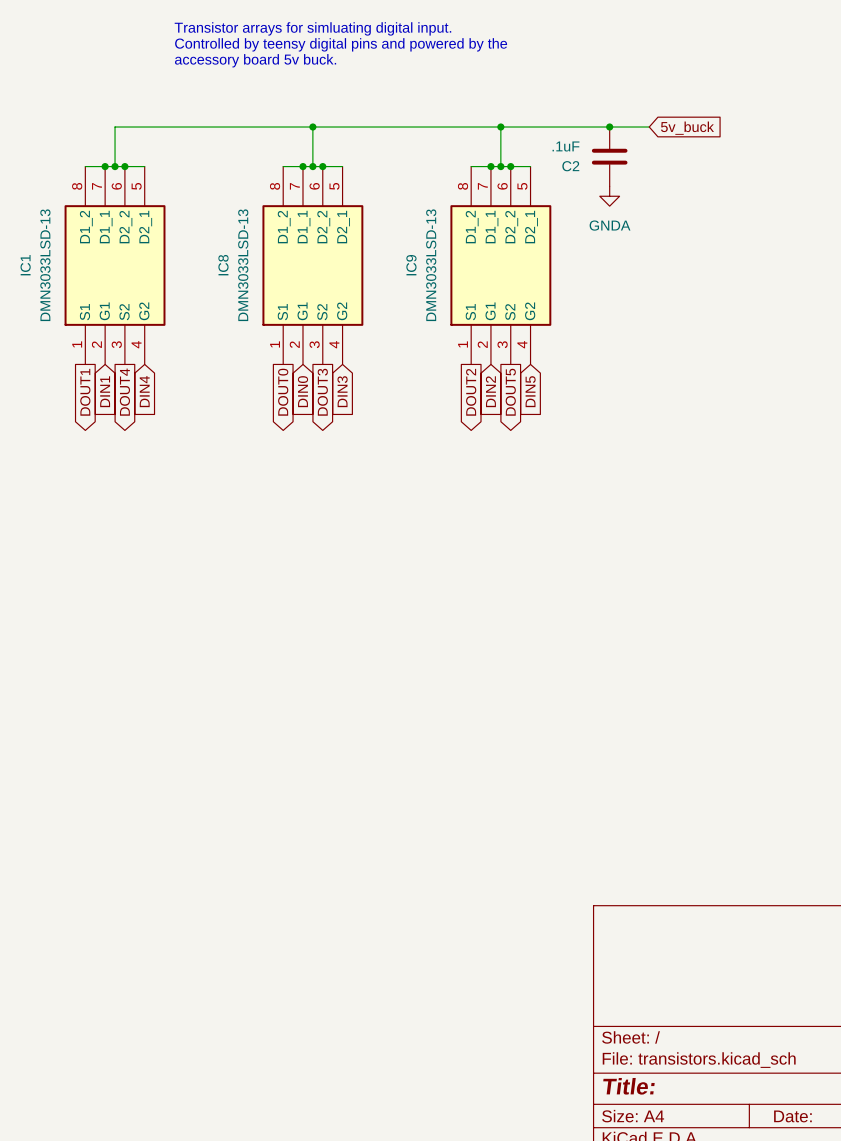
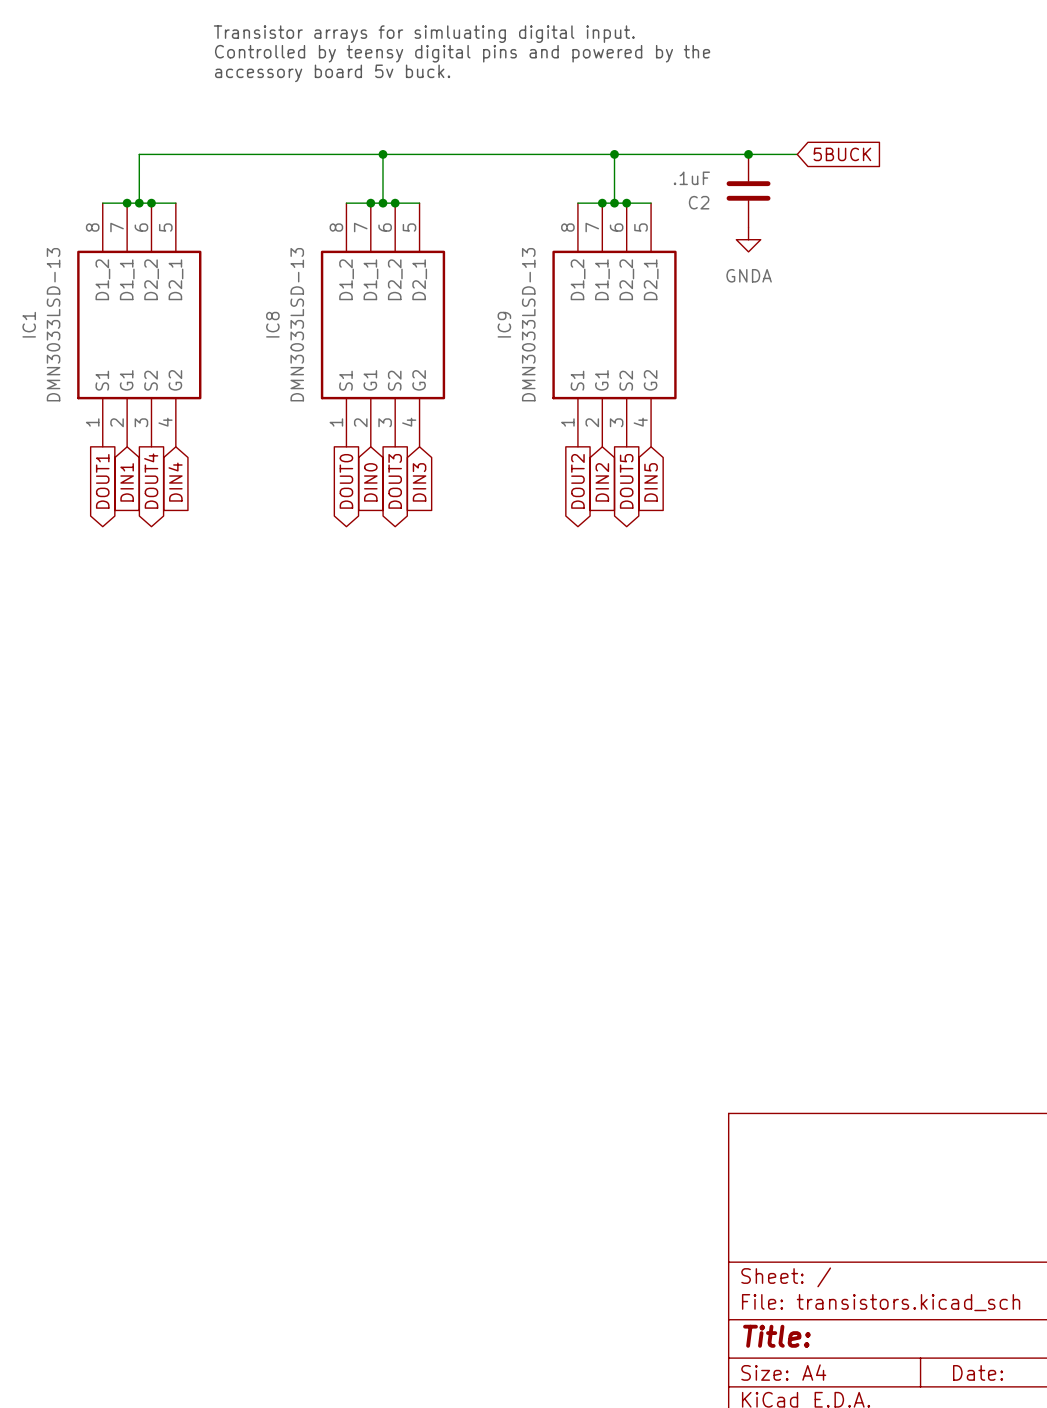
global label: 5v_buck (687, 128) -> 5BUCK (842, 154)

